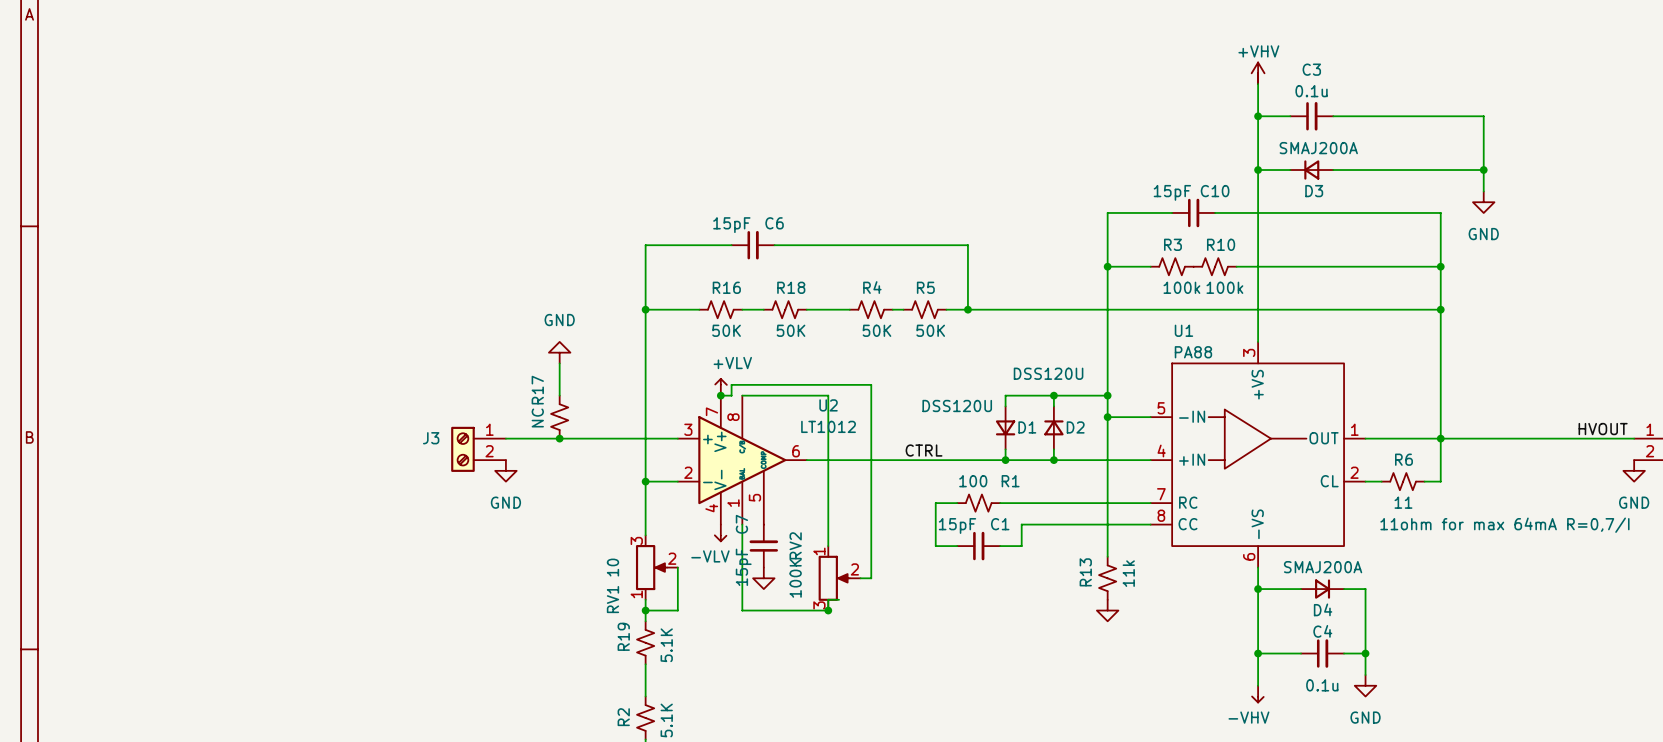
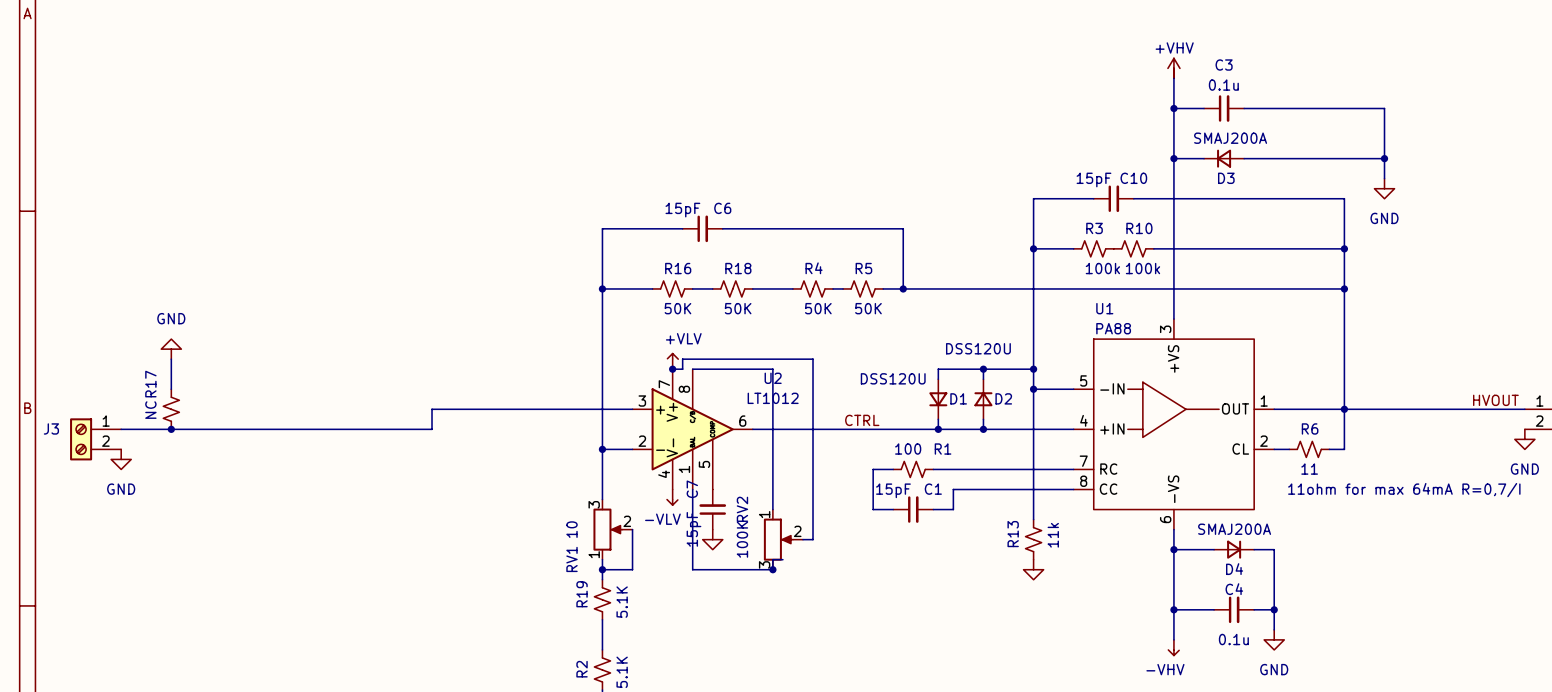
power symbol: GND (559, 352) -> none
wire: (559, 363) (559, 395) -> none
power symbol: none -> GND (171, 349)
wire: none -> (171, 359) (171, 389)
R17 position: (559, 417) -> (171, 409)
wire: none -> (472, 409) (432, 409) (432, 429) (121, 429)
junction: (559, 438) -> none
J3 position: (478, 449) -> (95, 439)
junction: none -> (171, 429)
power symbol: GND (505, 470) -> none
power symbol: none -> GND (121, 459)

